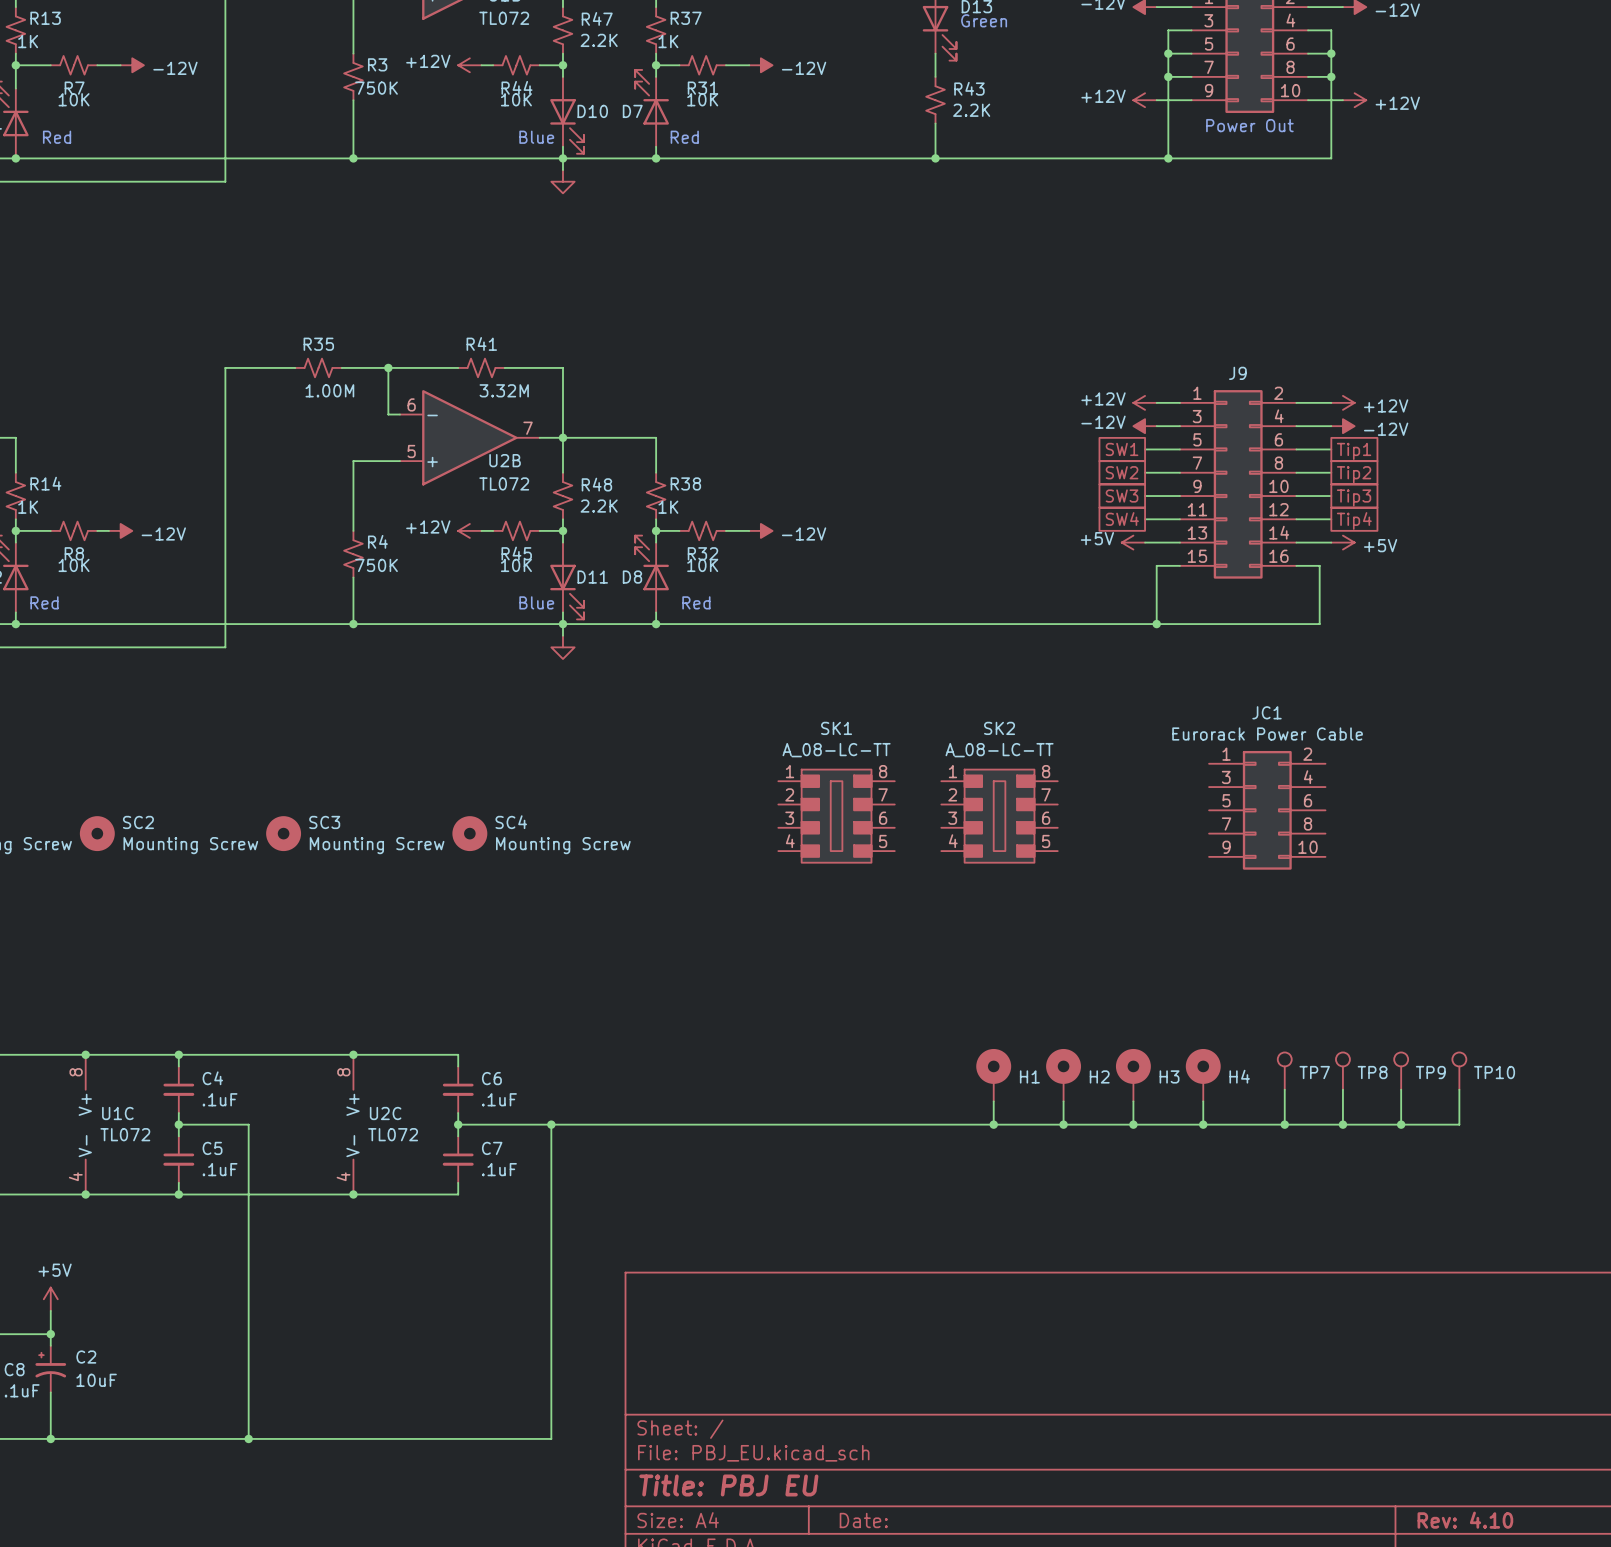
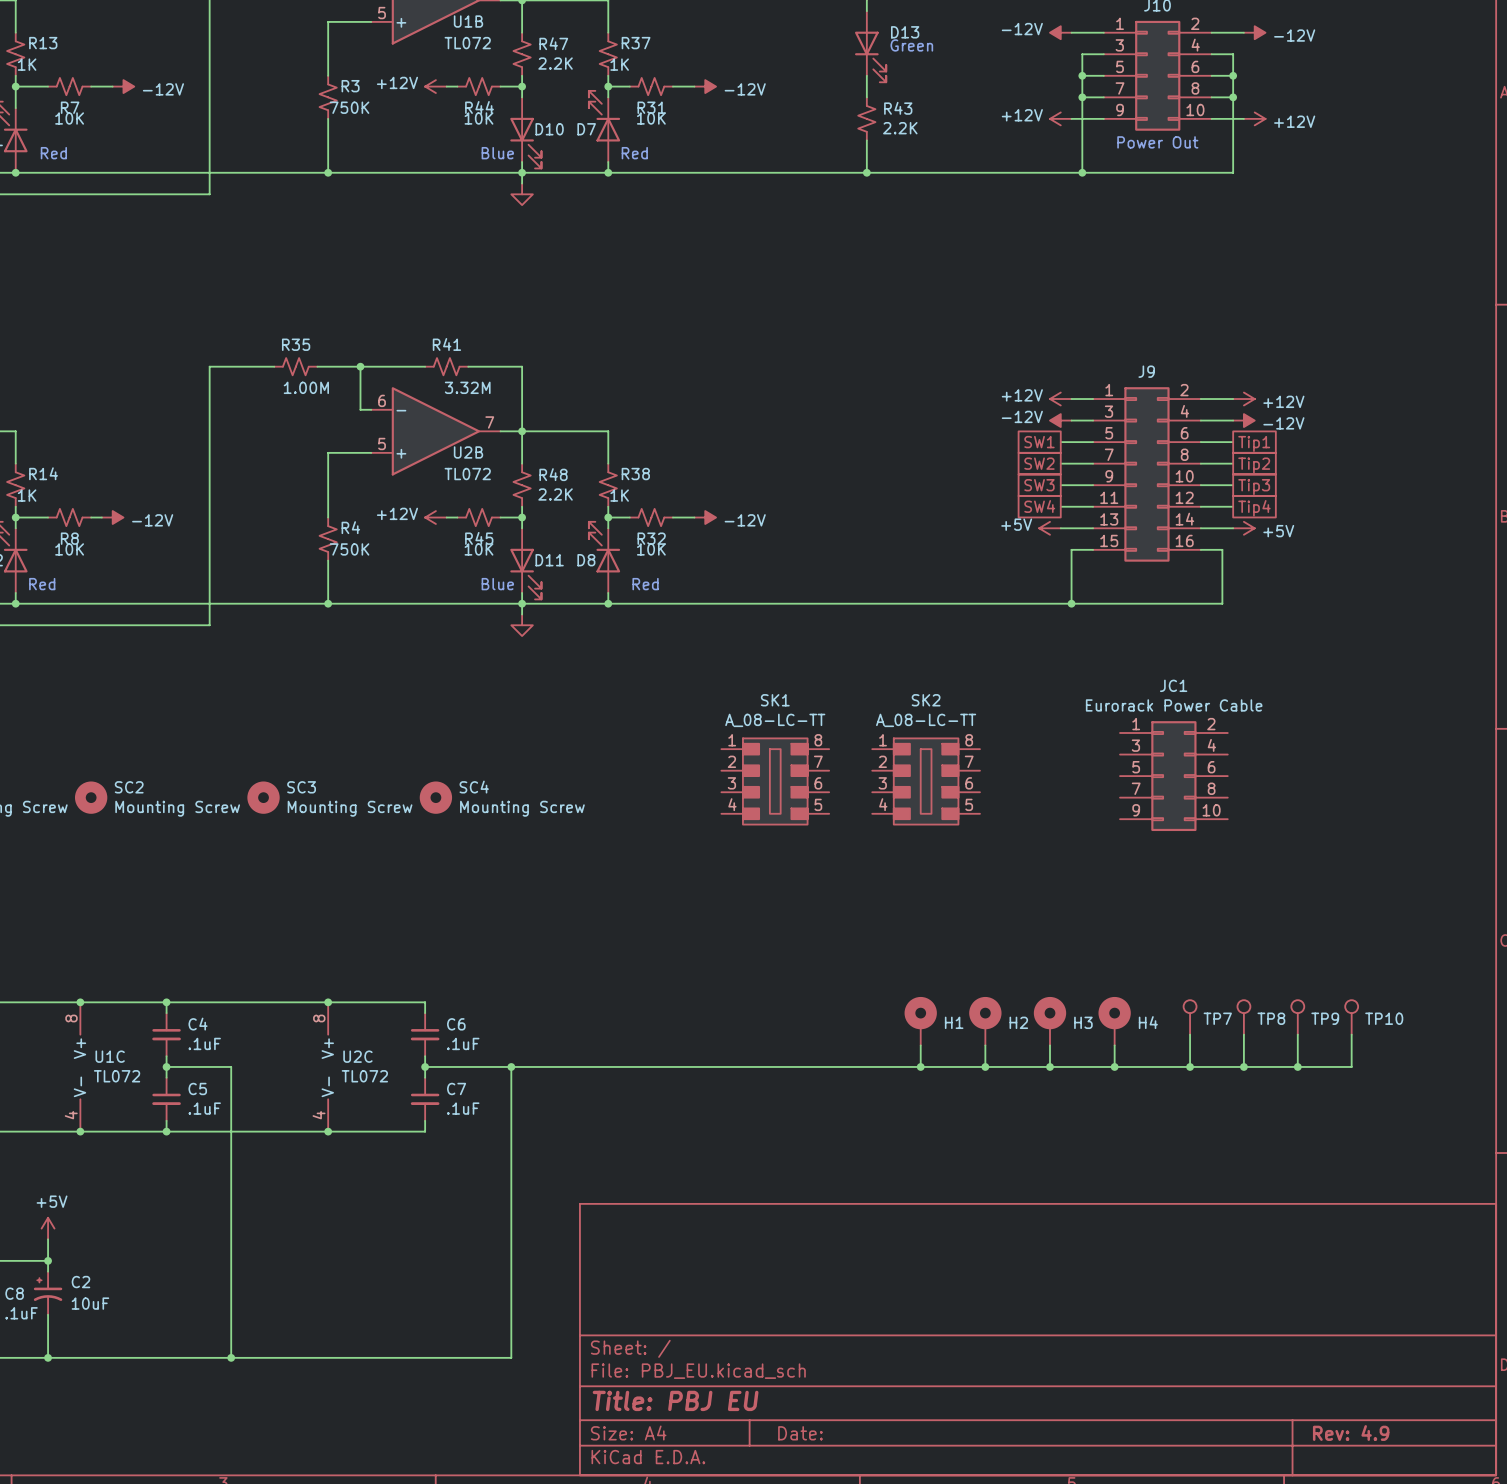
title block: Rev: 4.10 (1465, 1520) -> Rev: 4.9 (1351, 1433)

